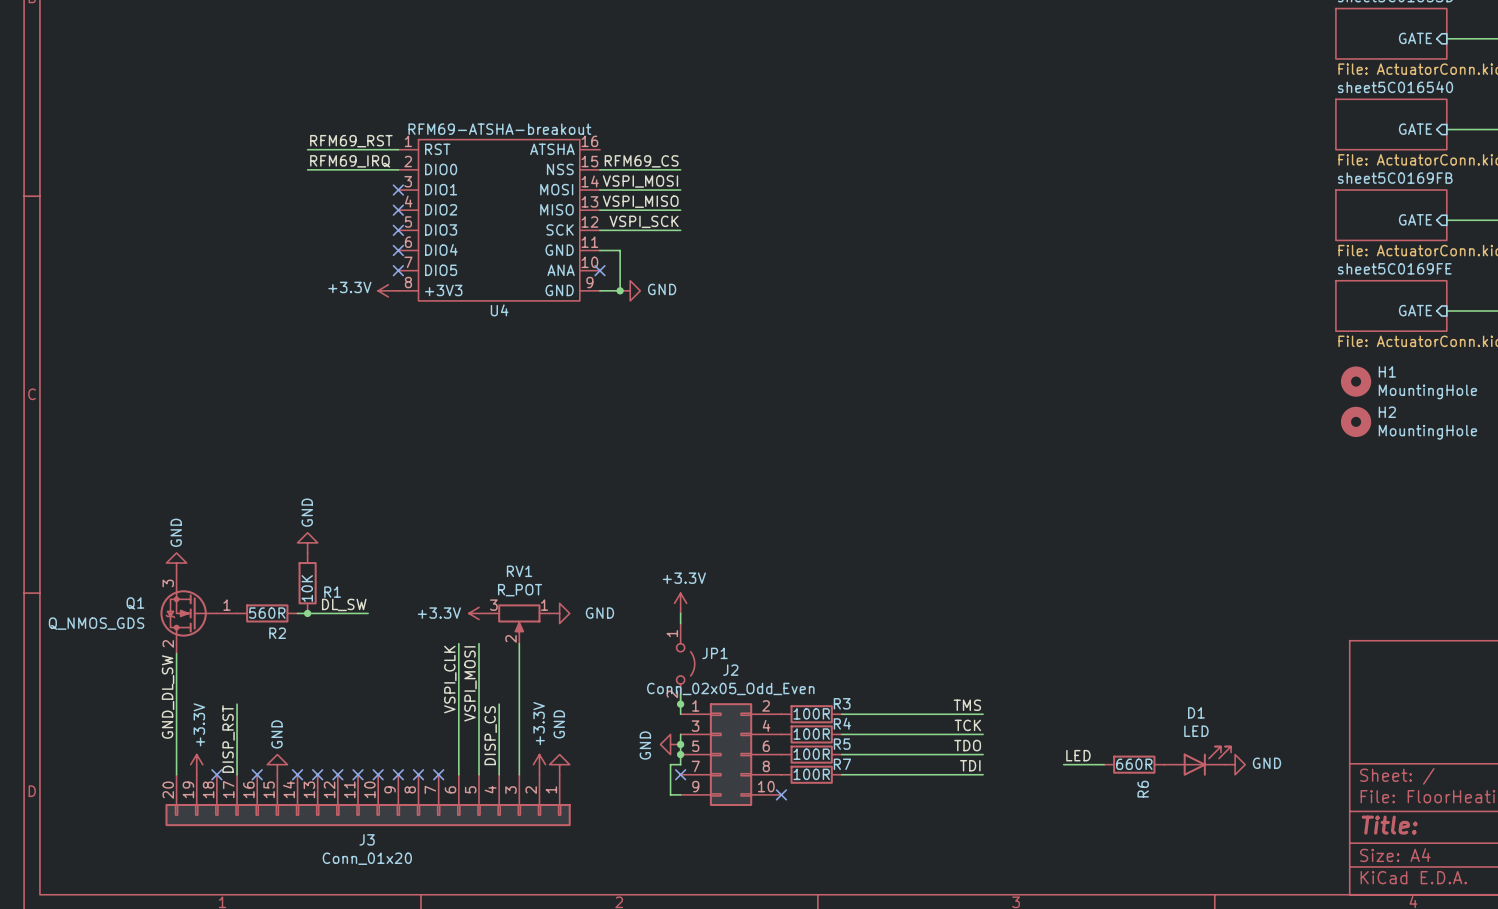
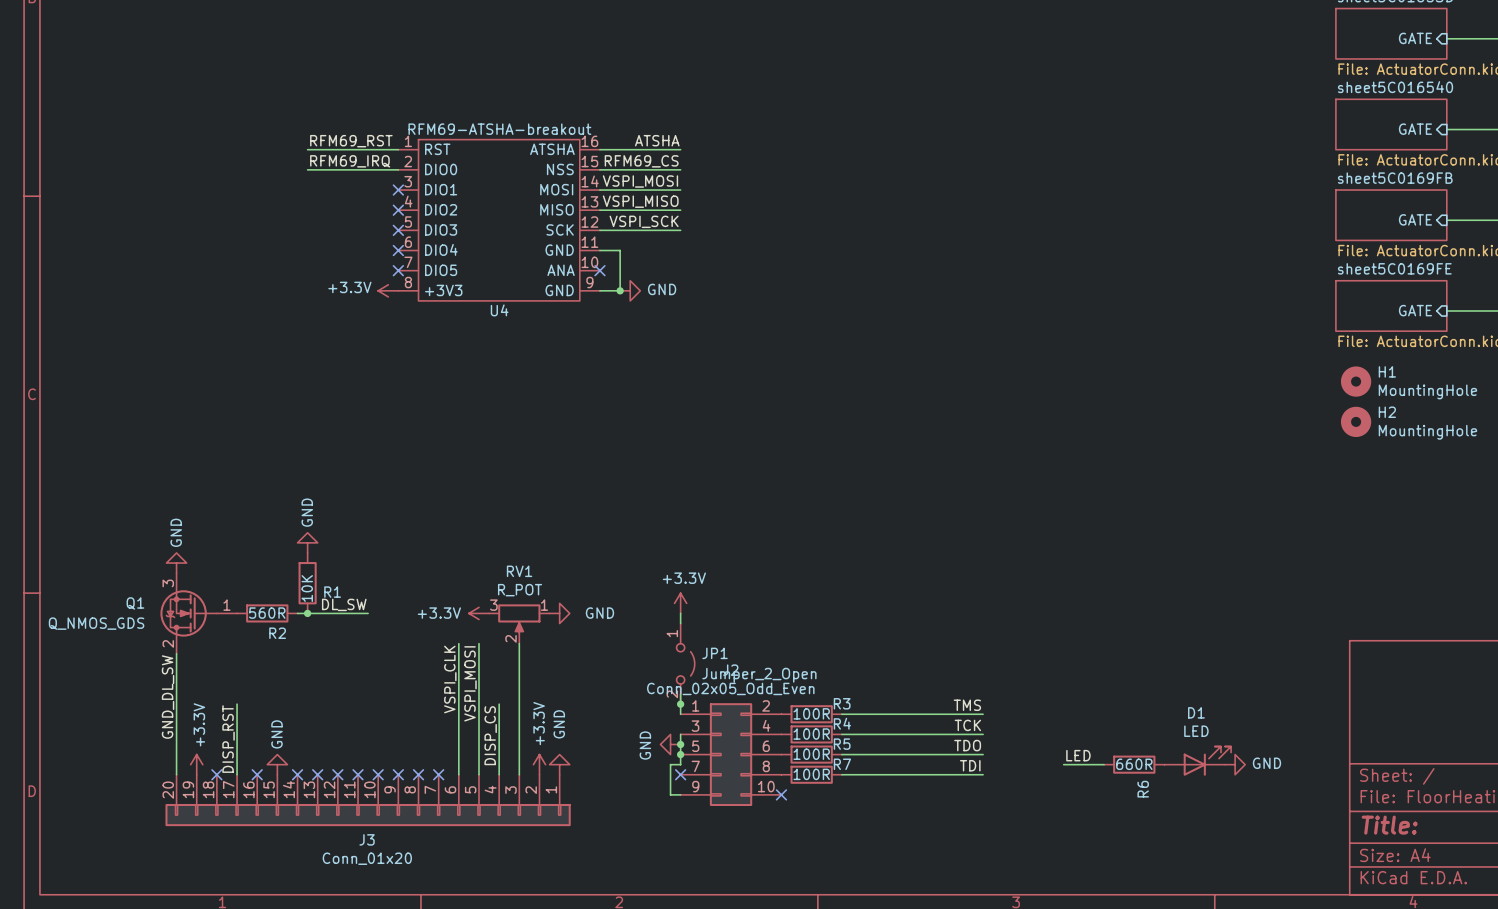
label: none -> ATSHA (657, 140)
wire: none -> (599, 149) (680, 149)
JP1 value: none -> Jumper_2_Open (759, 675)

